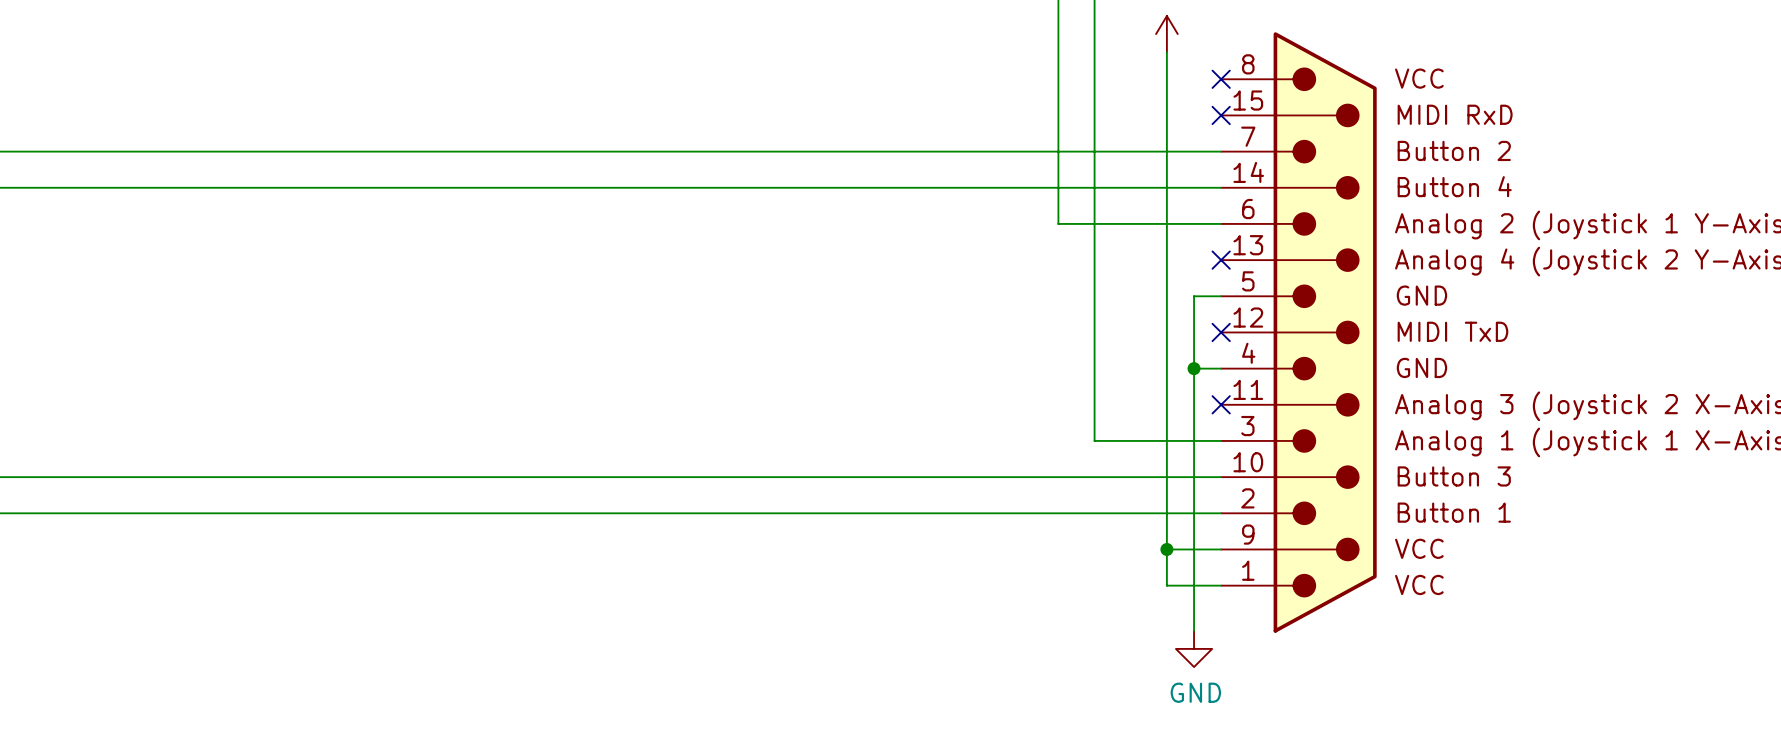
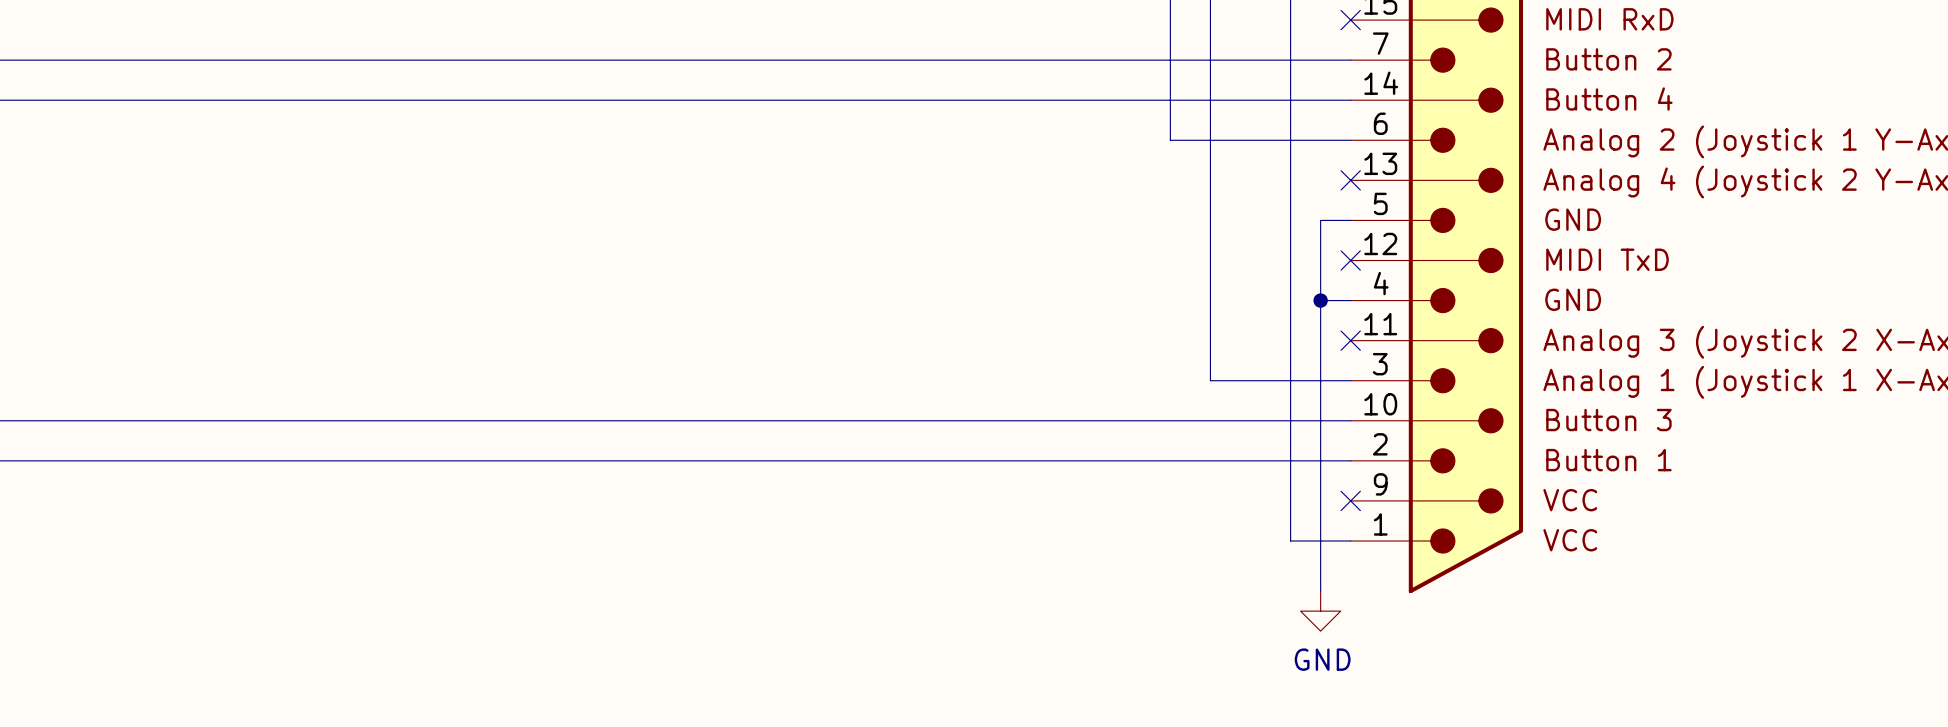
wire: (1166, 549) (1221, 549) -> none
junction: (1166, 549) -> none
no-connect mark: none -> (1350, 500)

